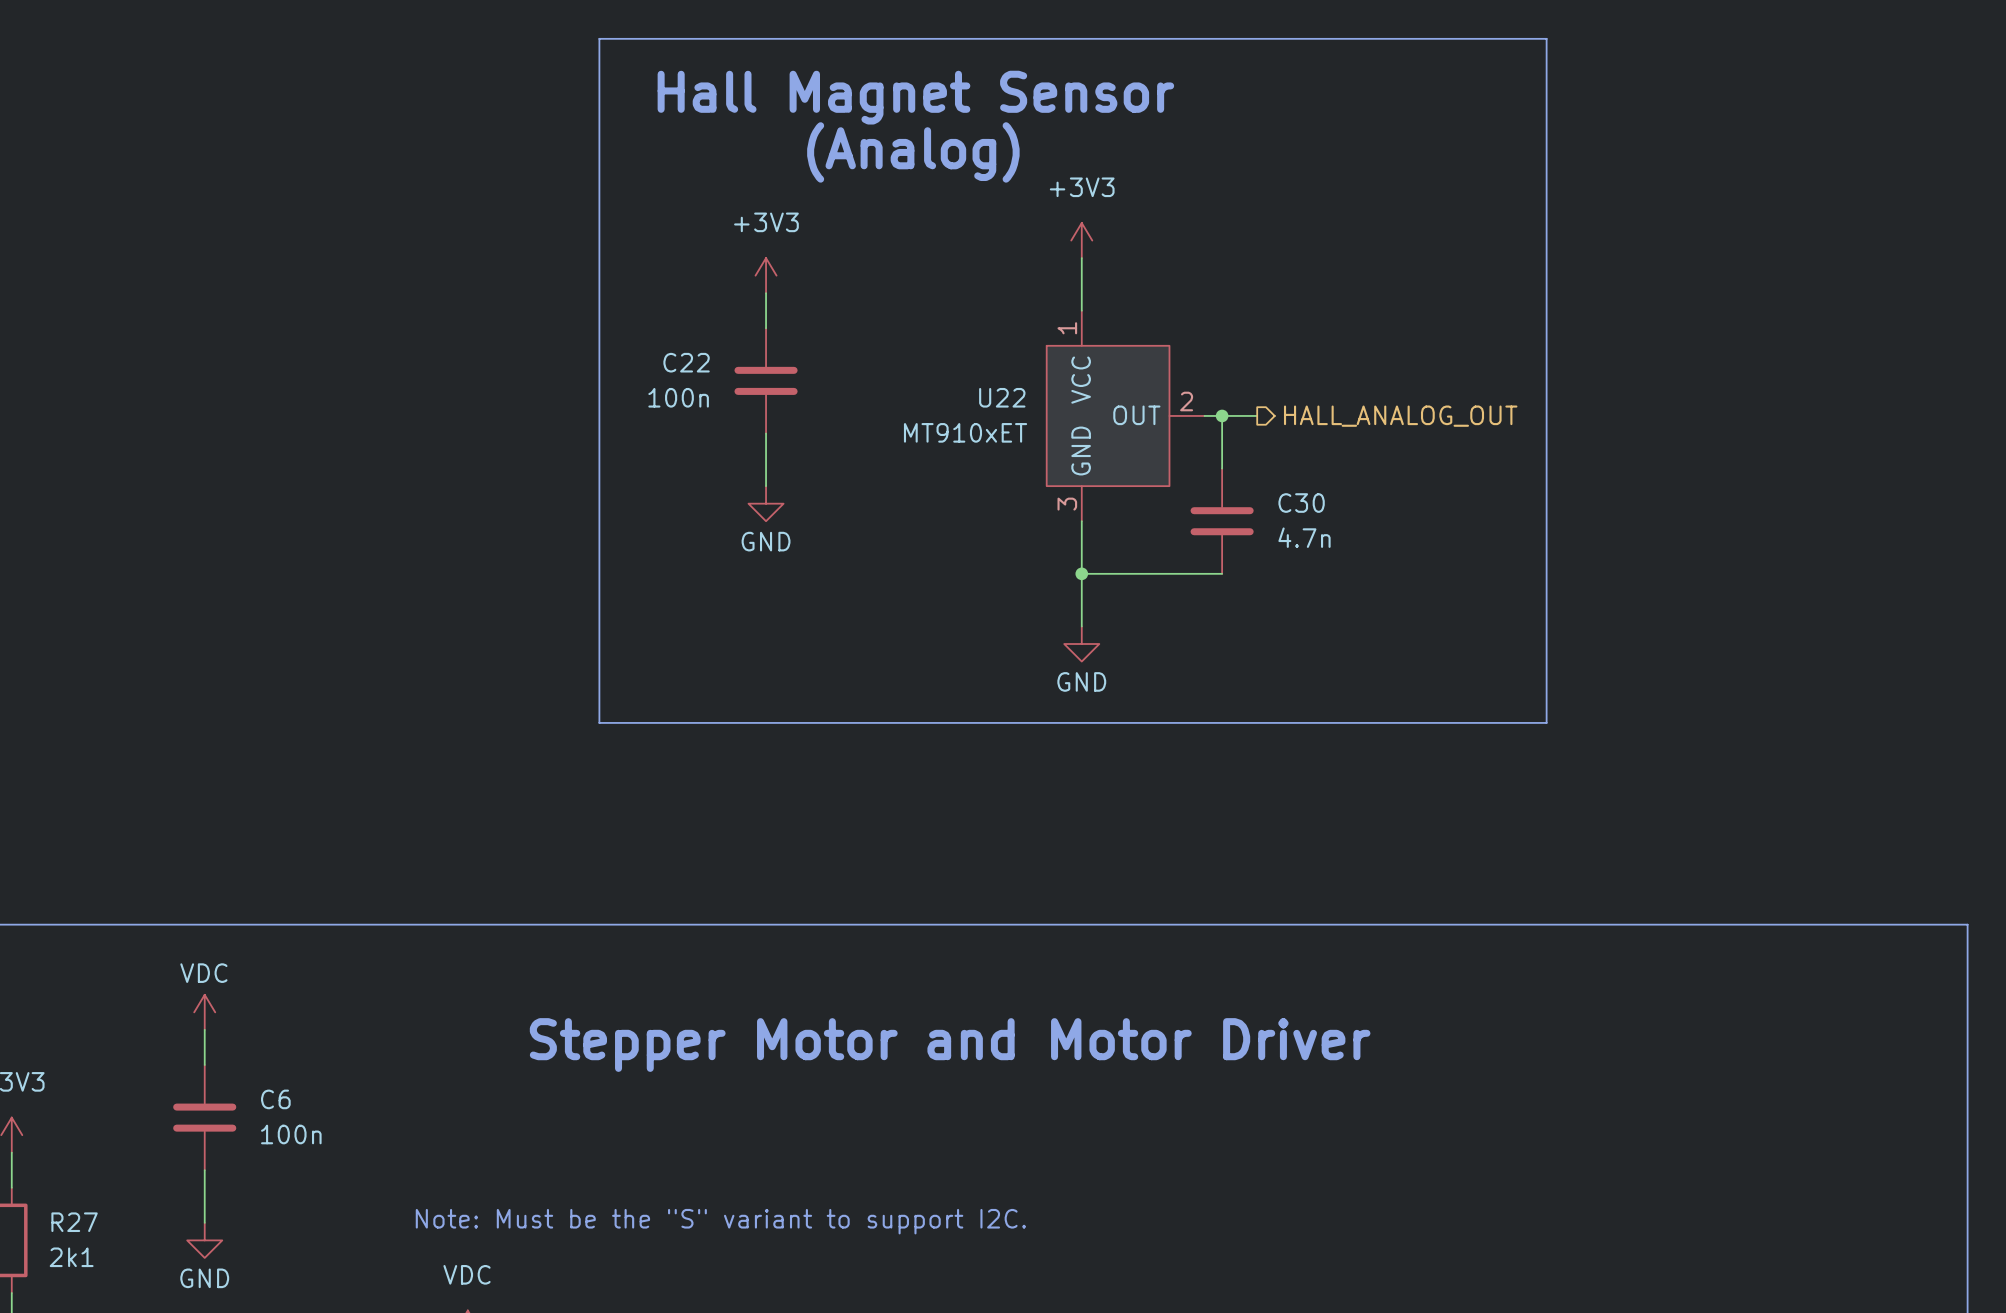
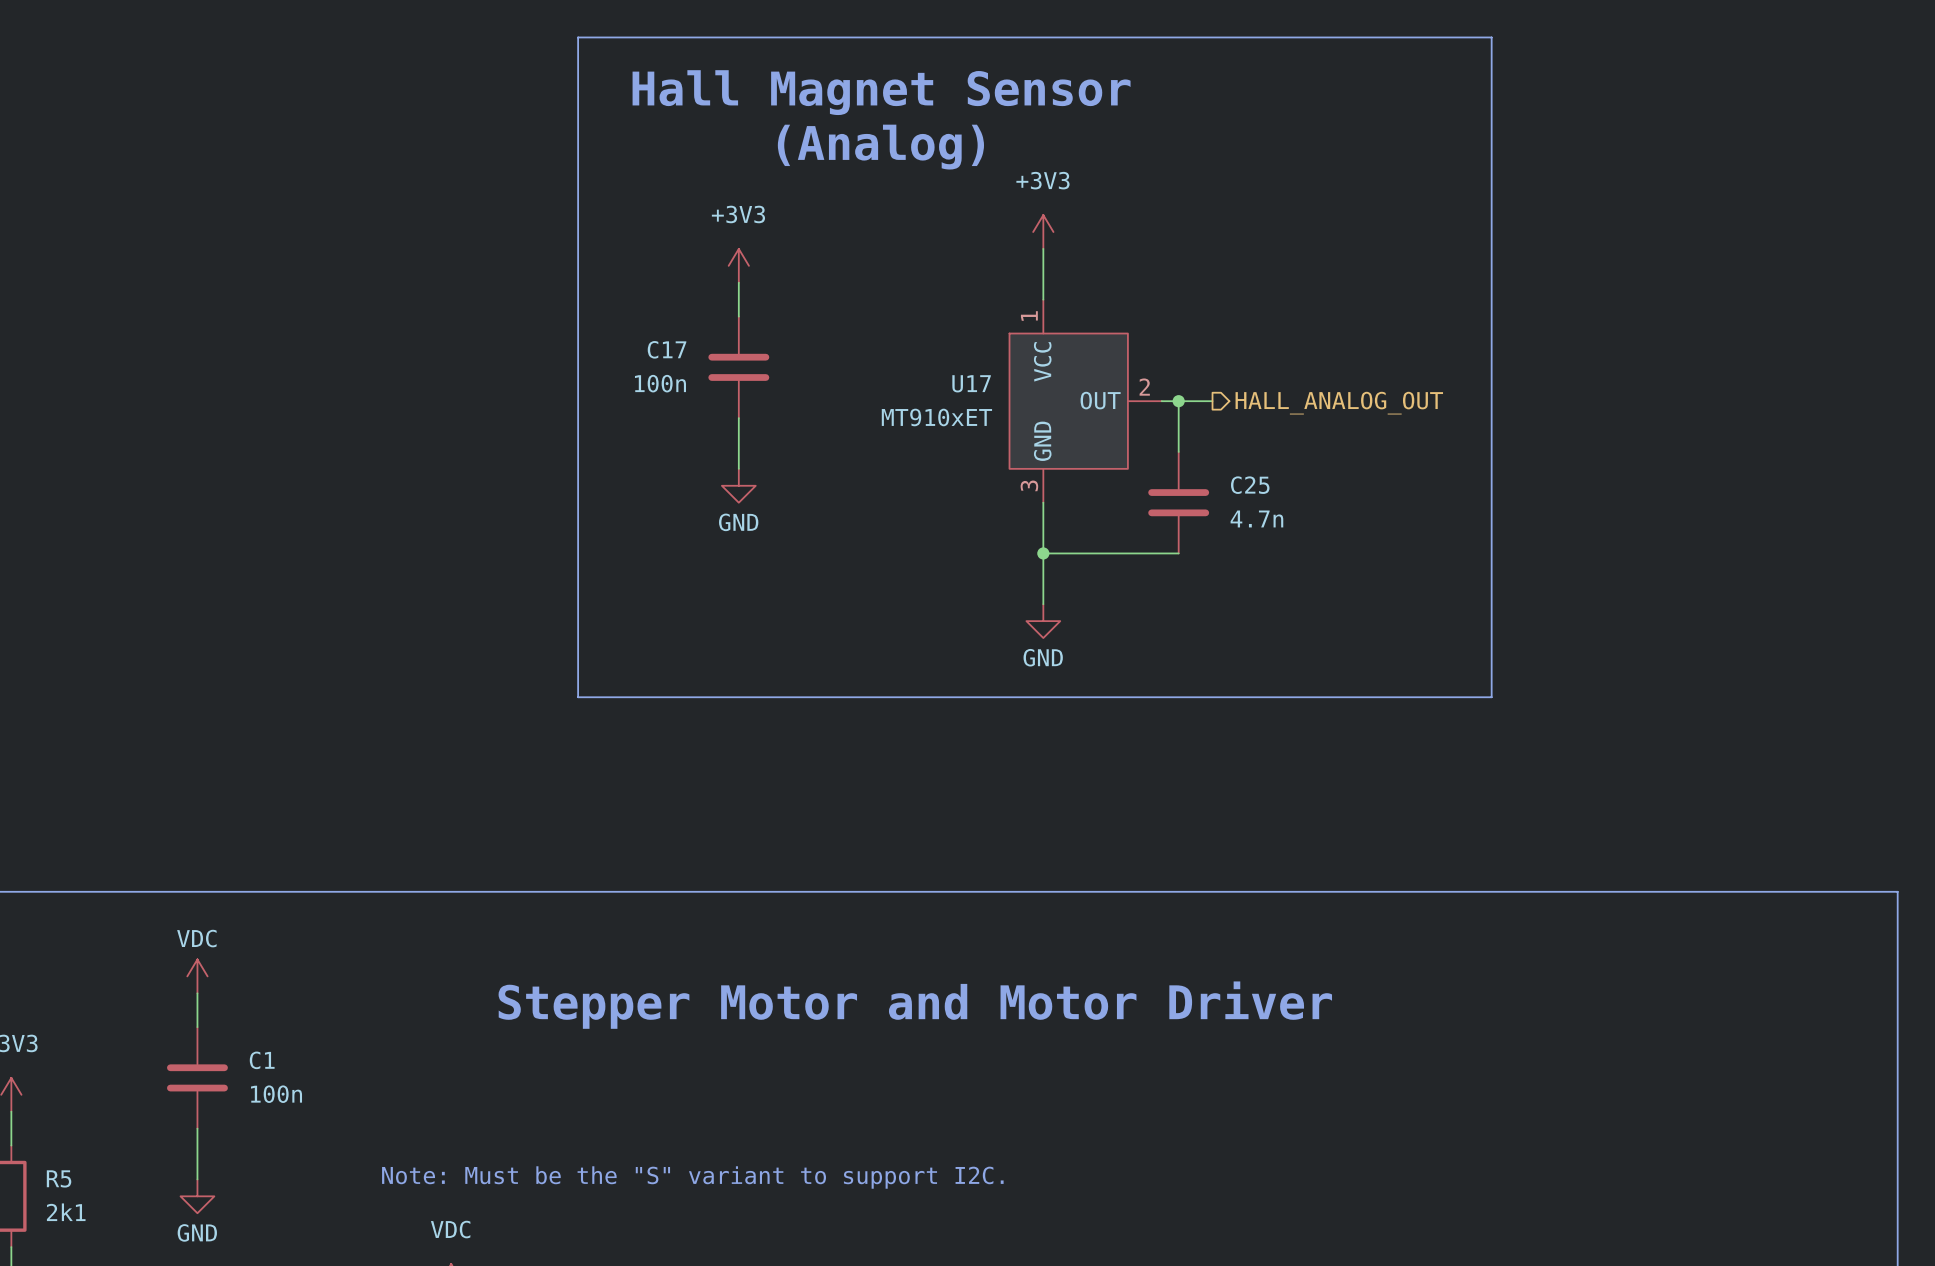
C22 name: C22 (686, 362) -> C17 (667, 349)
U22 name: U22 (1002, 397) -> U17 (971, 383)
C30 name: C30 (1301, 503) -> C25 (1250, 485)
C6 name: C6 (275, 1099) -> C1 (262, 1060)
R27 name: R27 (74, 1222) -> R5 (59, 1178)

